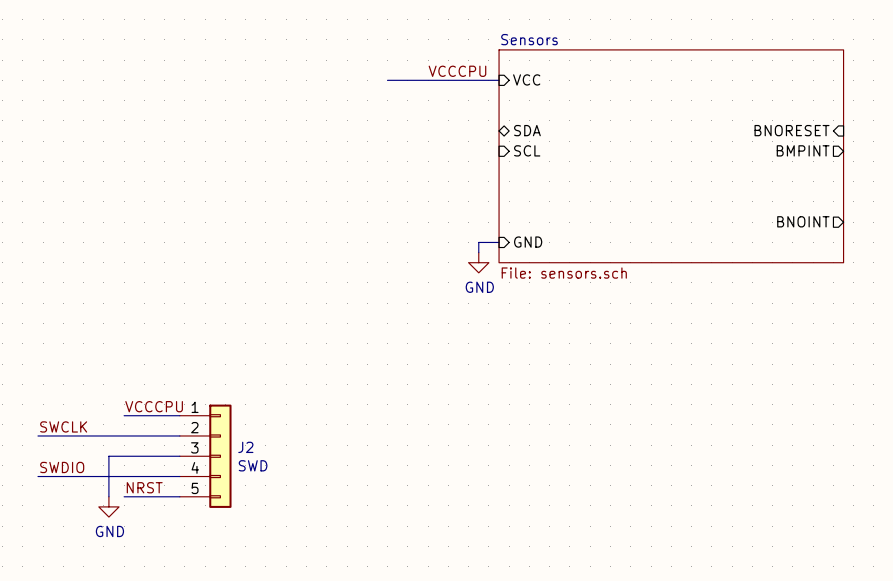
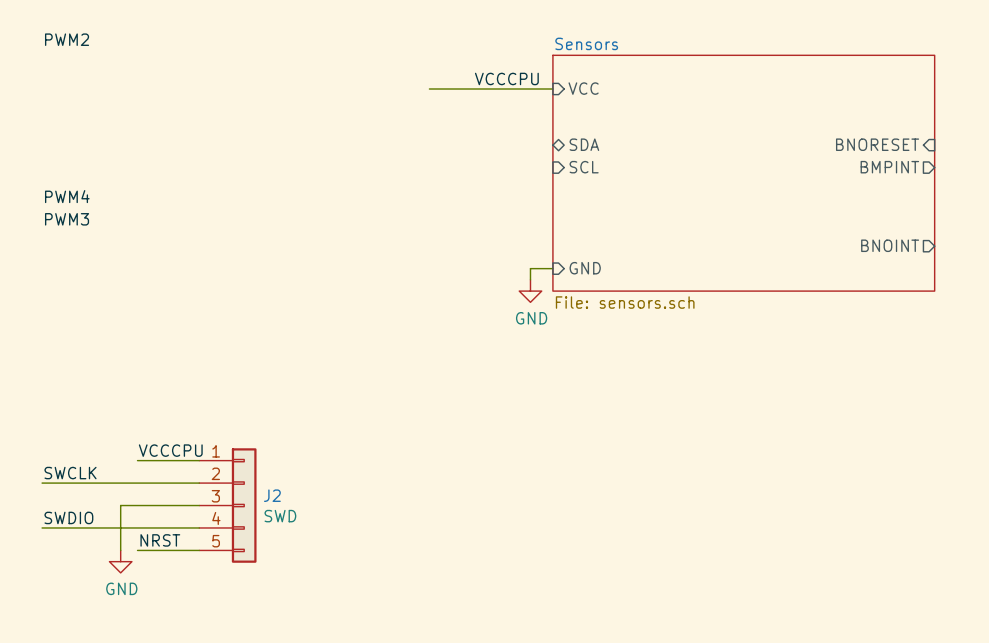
label: none -> PWM2 (67, 39)
label: none -> PWM4 (67, 196)
label: none -> PWM3 (67, 219)

